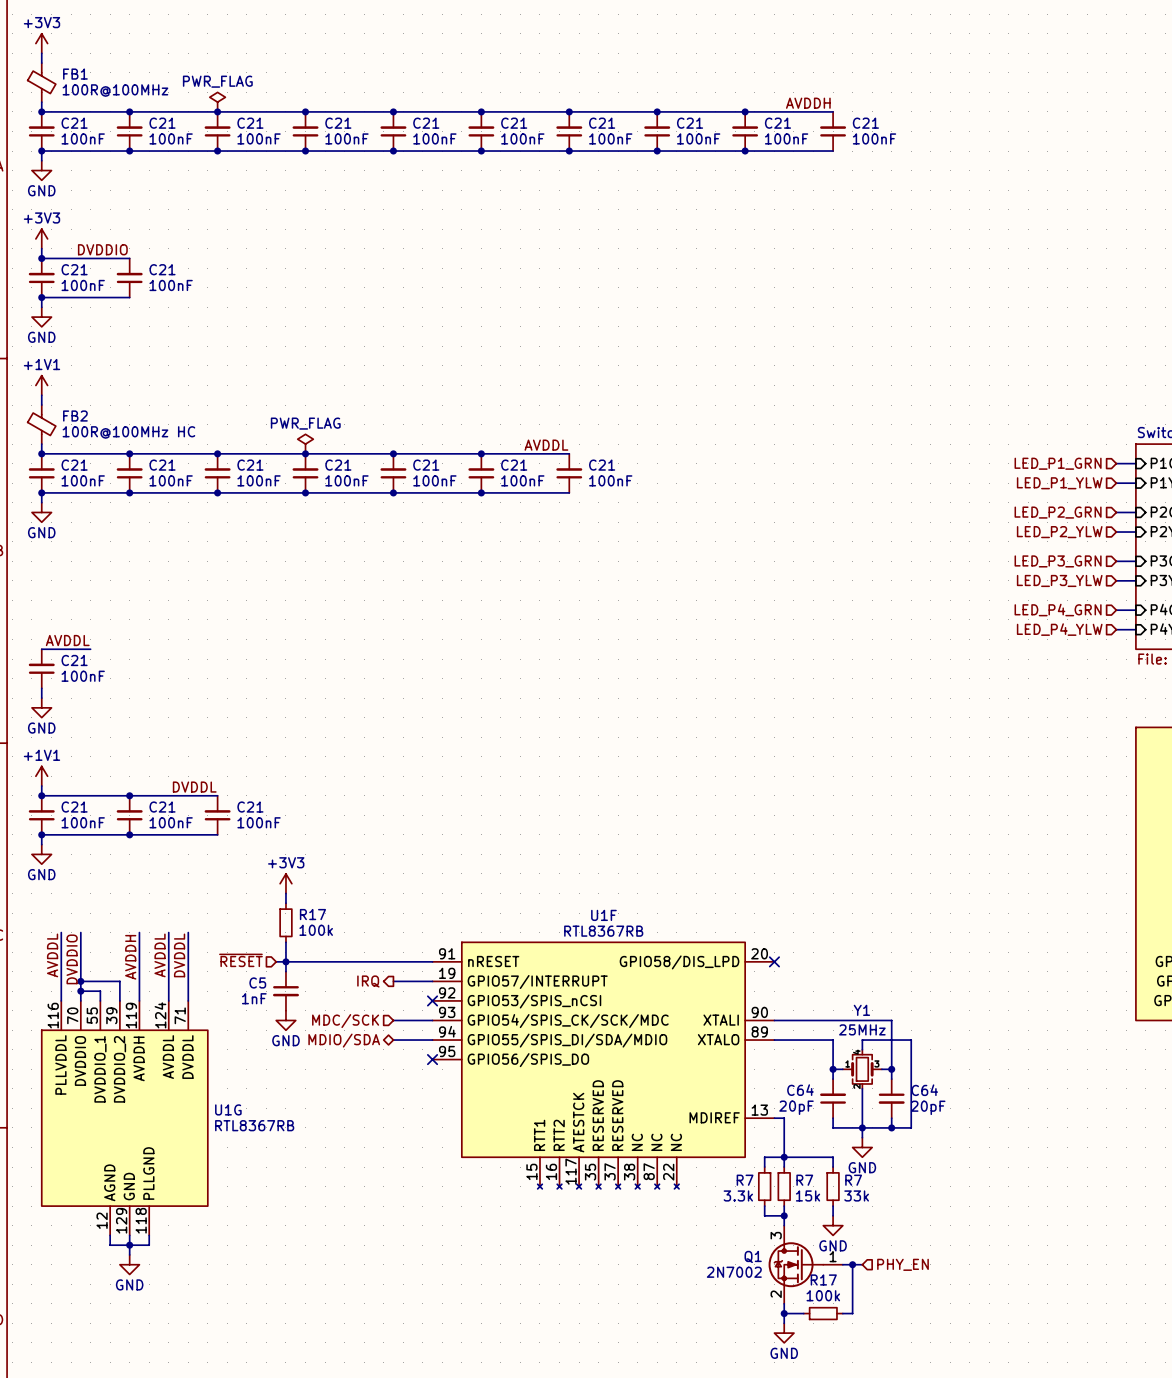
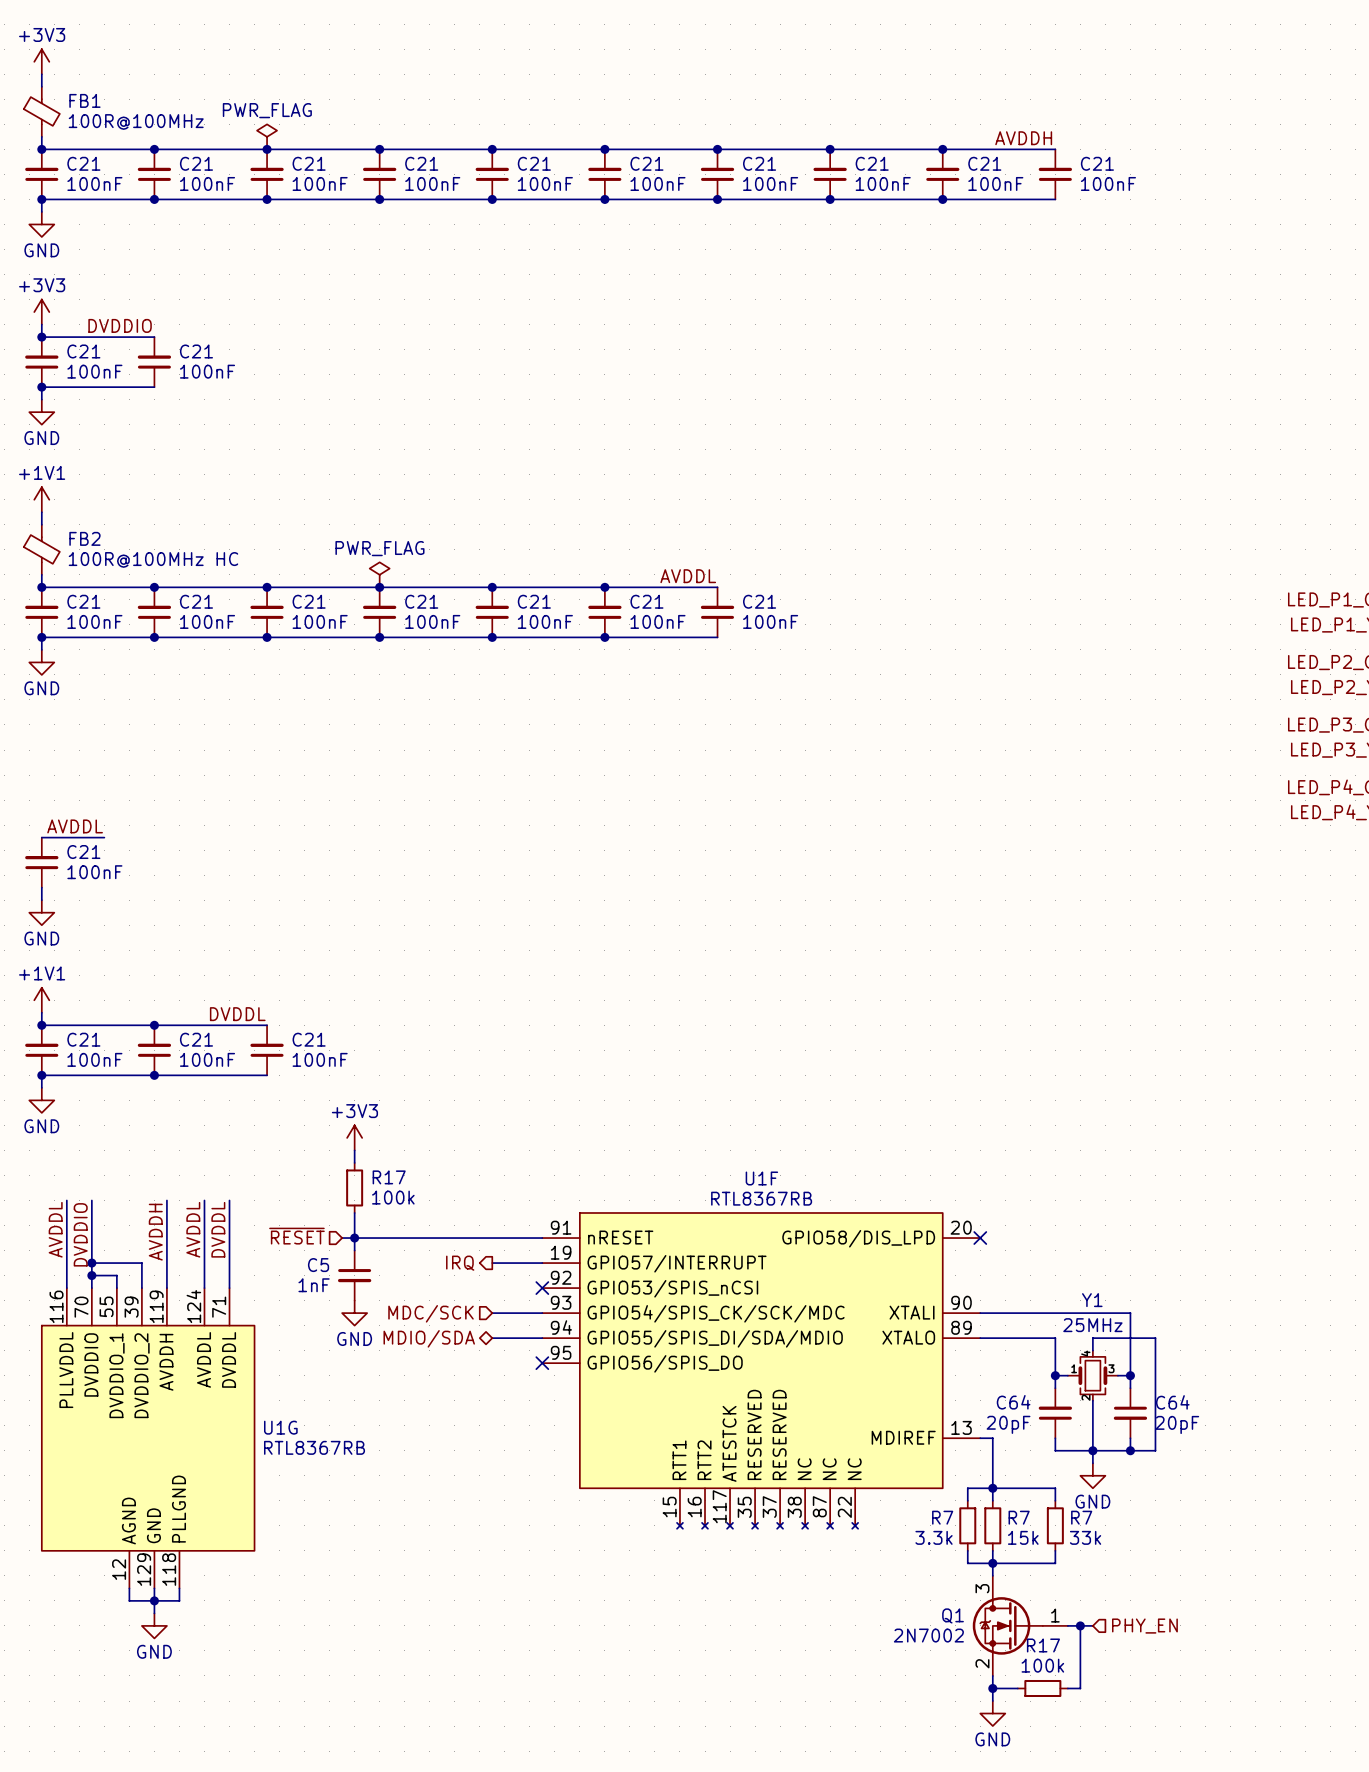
wire: none -> (992, 1563) (1055, 1563)
power symbol: GND (833, 1225) -> none

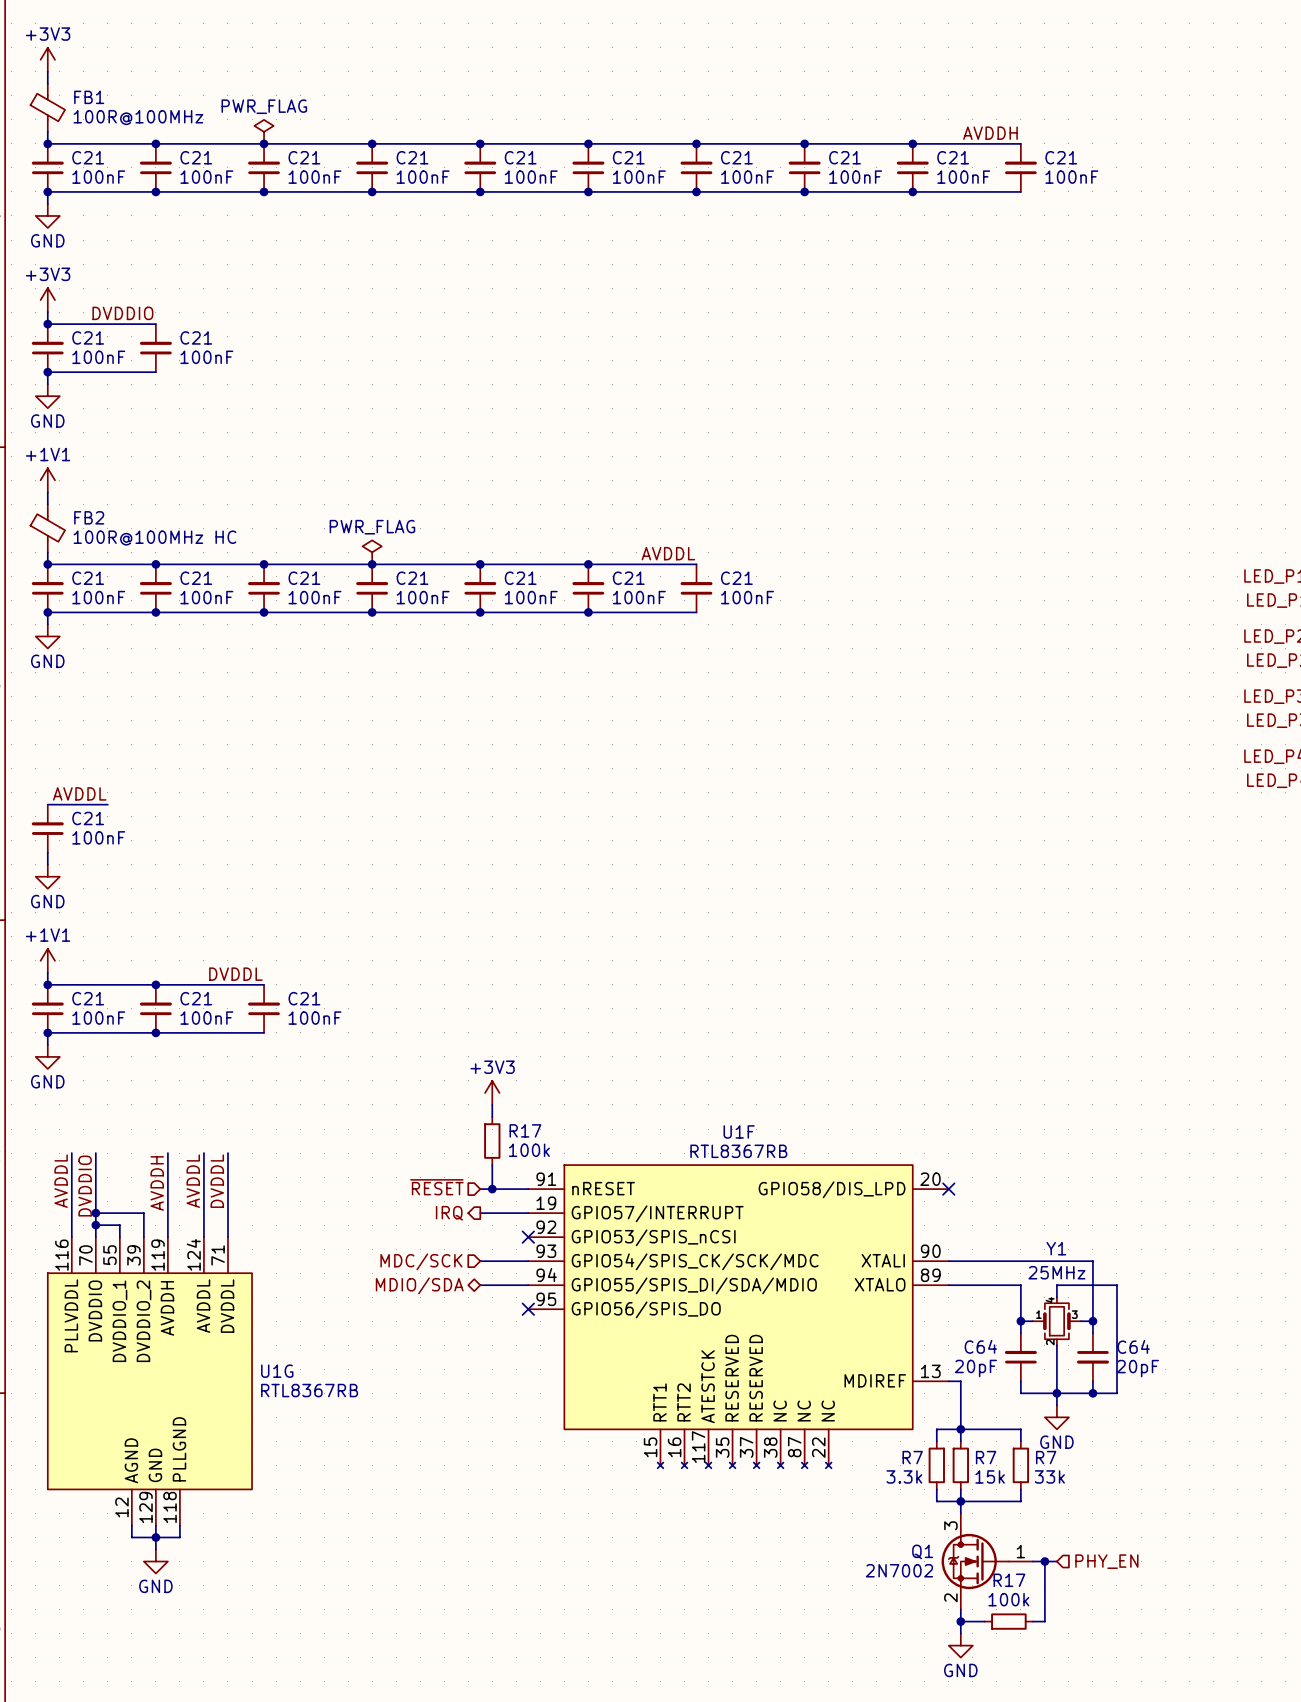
power symbol position: +3V3 (354, 1137) -> +3V3 (492, 1092)
wire: (354, 1150) (354, 1162) -> (492, 1104) (492, 1117)
R17 position: (354, 1187) -> (492, 1141)
wire: (354, 1212) (354, 1250) -> none
wire: none -> (492, 1165) (492, 1189)
hierarchical label position: ~{RESET} (296, 1236) -> ~{RESET} (436, 1187)
wire: (342, 1238) (492, 1238) -> none
junction: (354, 1238) -> none
junction: none -> (492, 1189)
C5: 1nF (354, 1275) -> none
power symbol: GND (354, 1313) -> none

